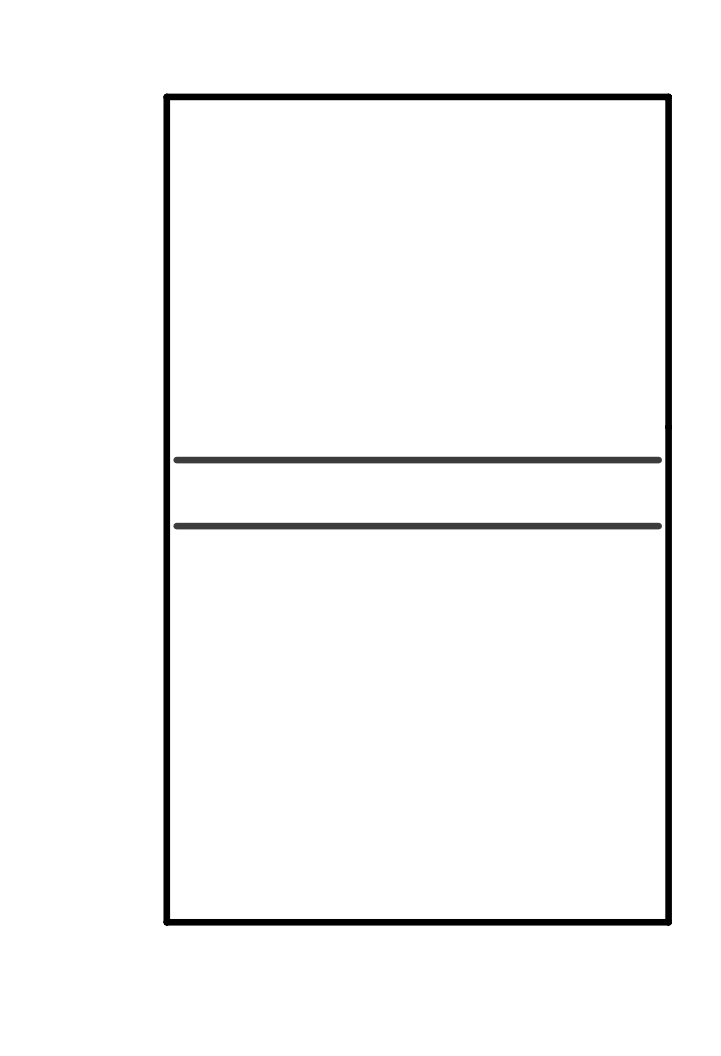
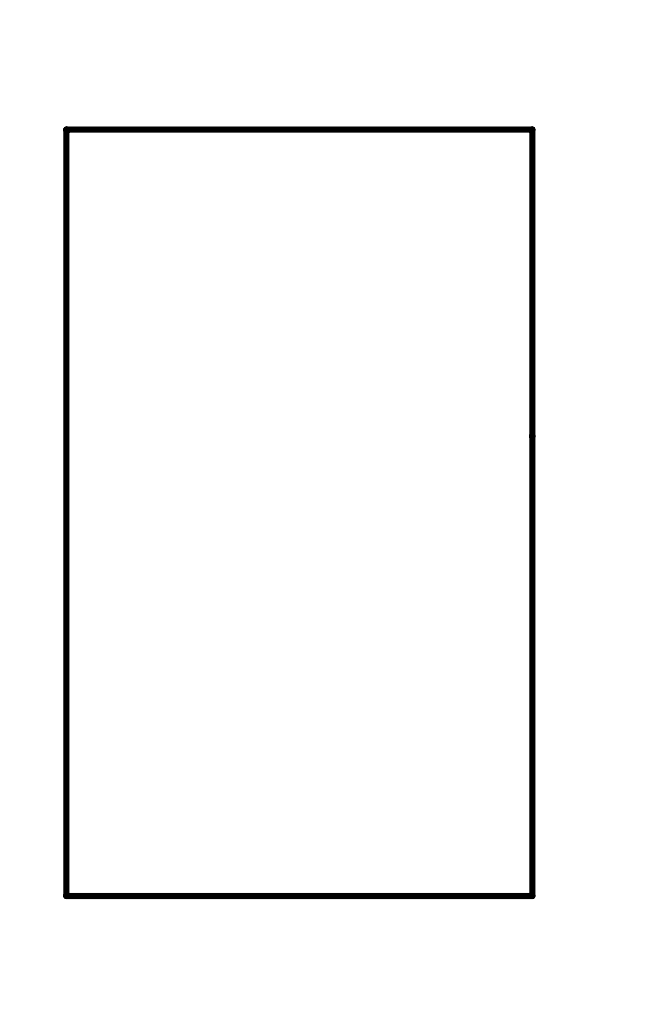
line: (176, 460) (658, 460) -> none
line: (176, 526) (658, 526) -> none

